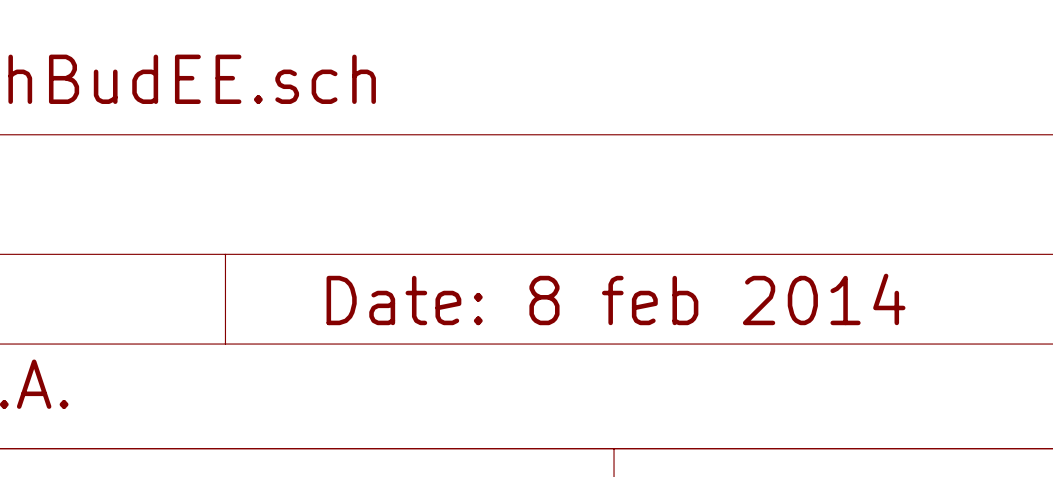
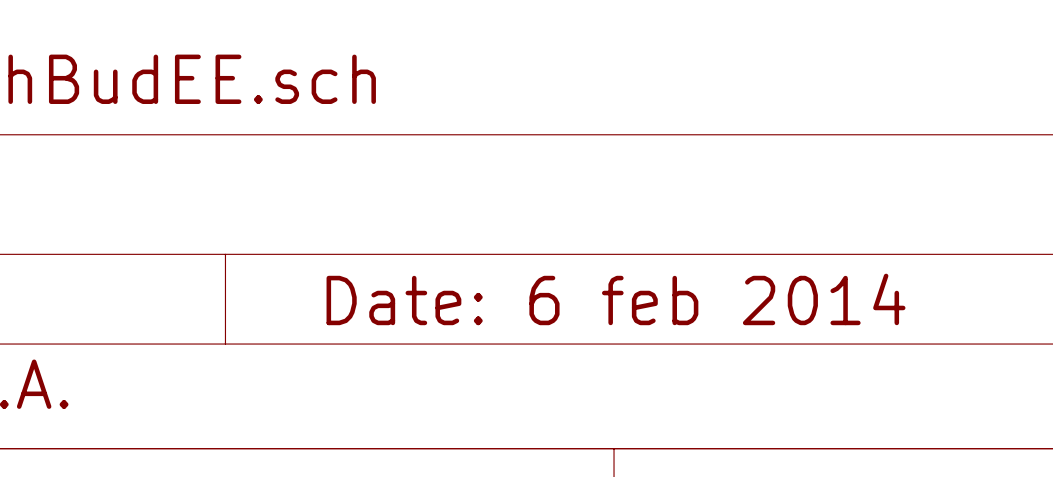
title block: Date: 8 feb 2014 (616, 299) -> Date: 6 feb 2014 (616, 299)

